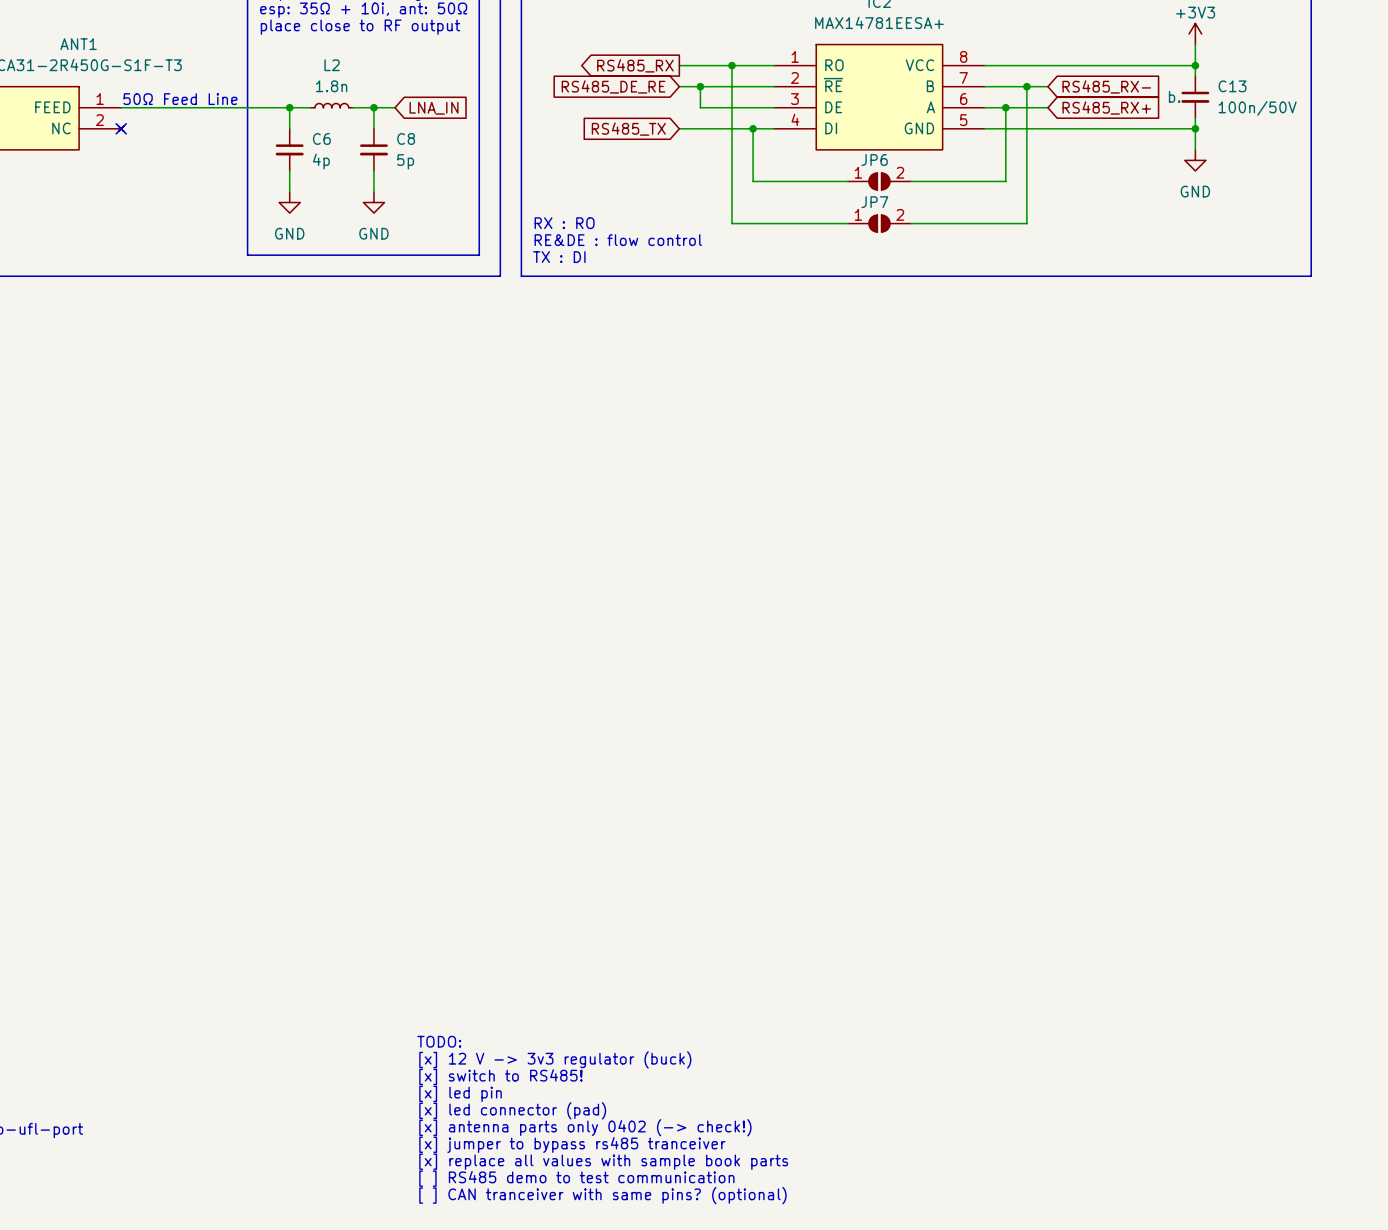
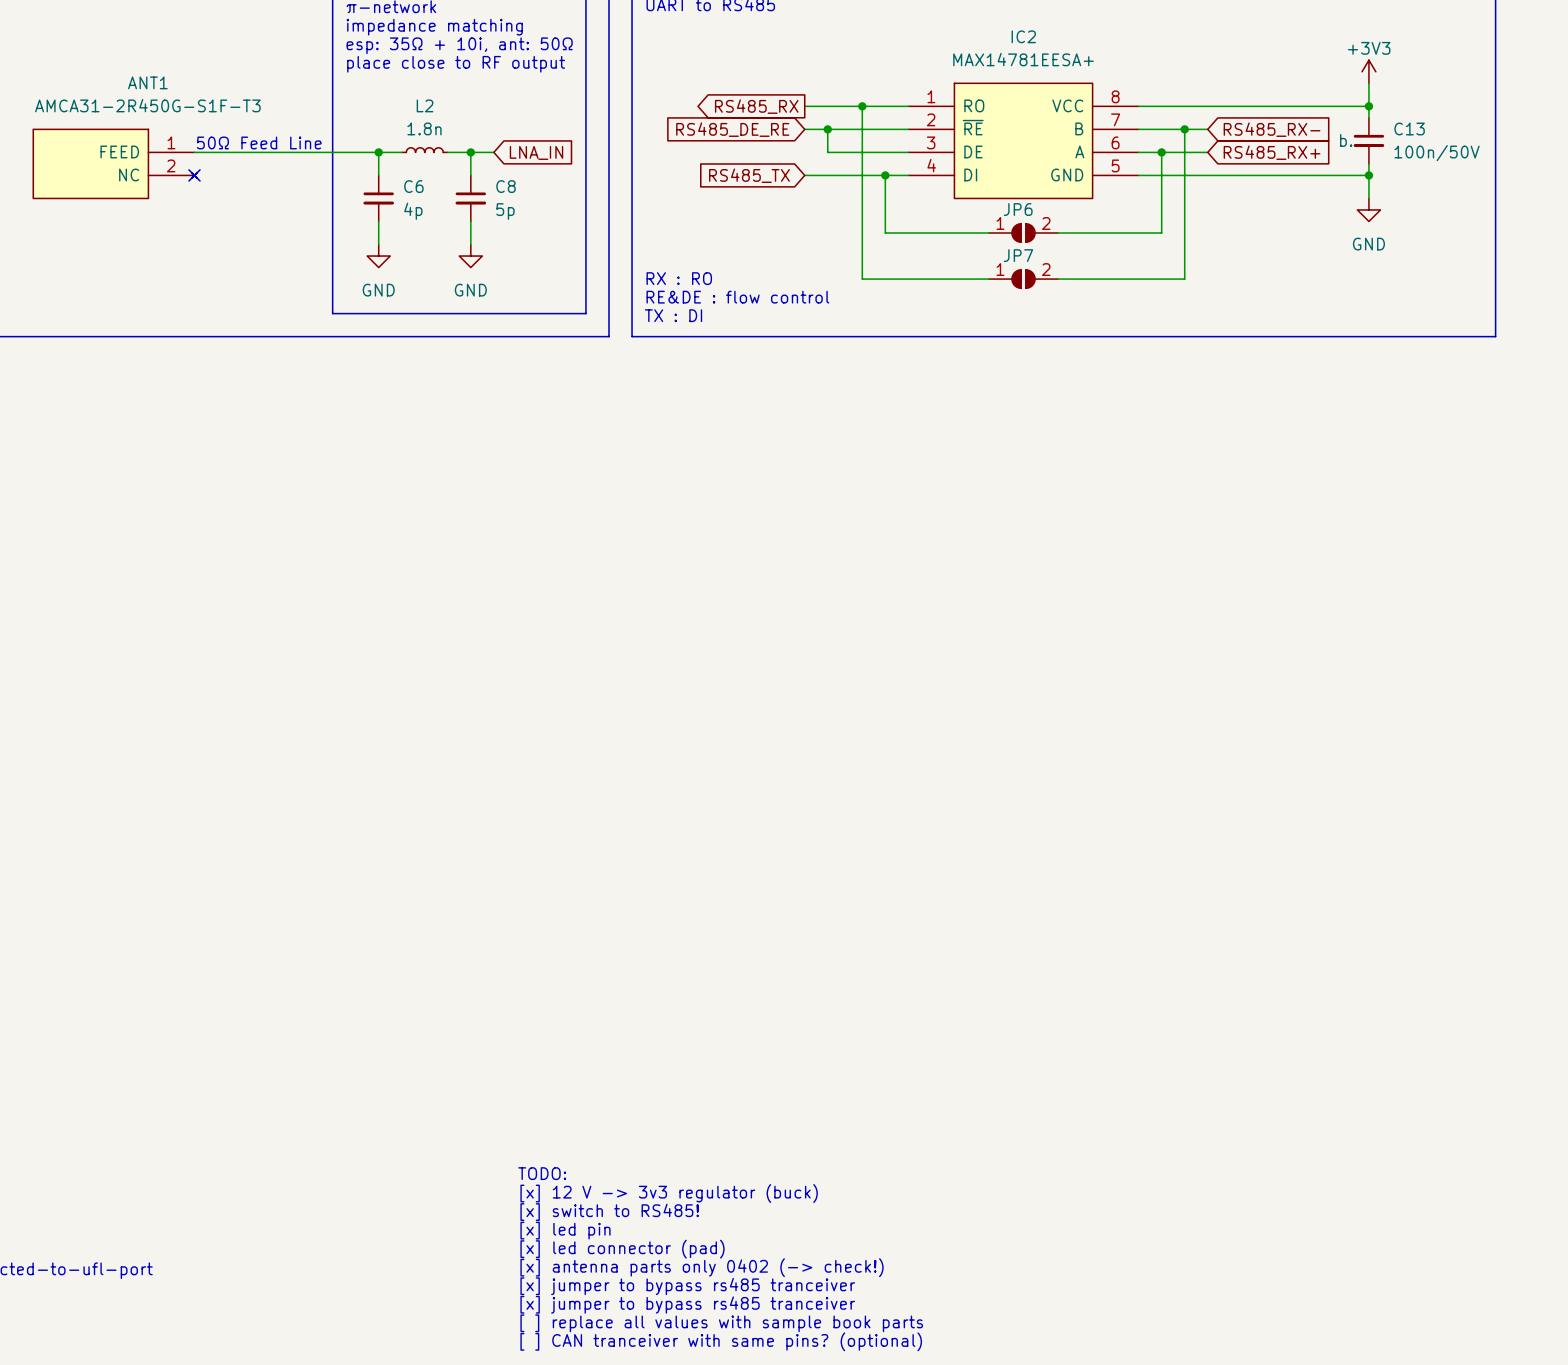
text: [x] replace all values with sample book parts (603, 1161) -> [x] jumper to bypass rs485 tranceiver (687, 1304)
text: [ ] RS485 demo to test communication (576, 1178) -> [ ] replace all values with sample book parts (721, 1323)

